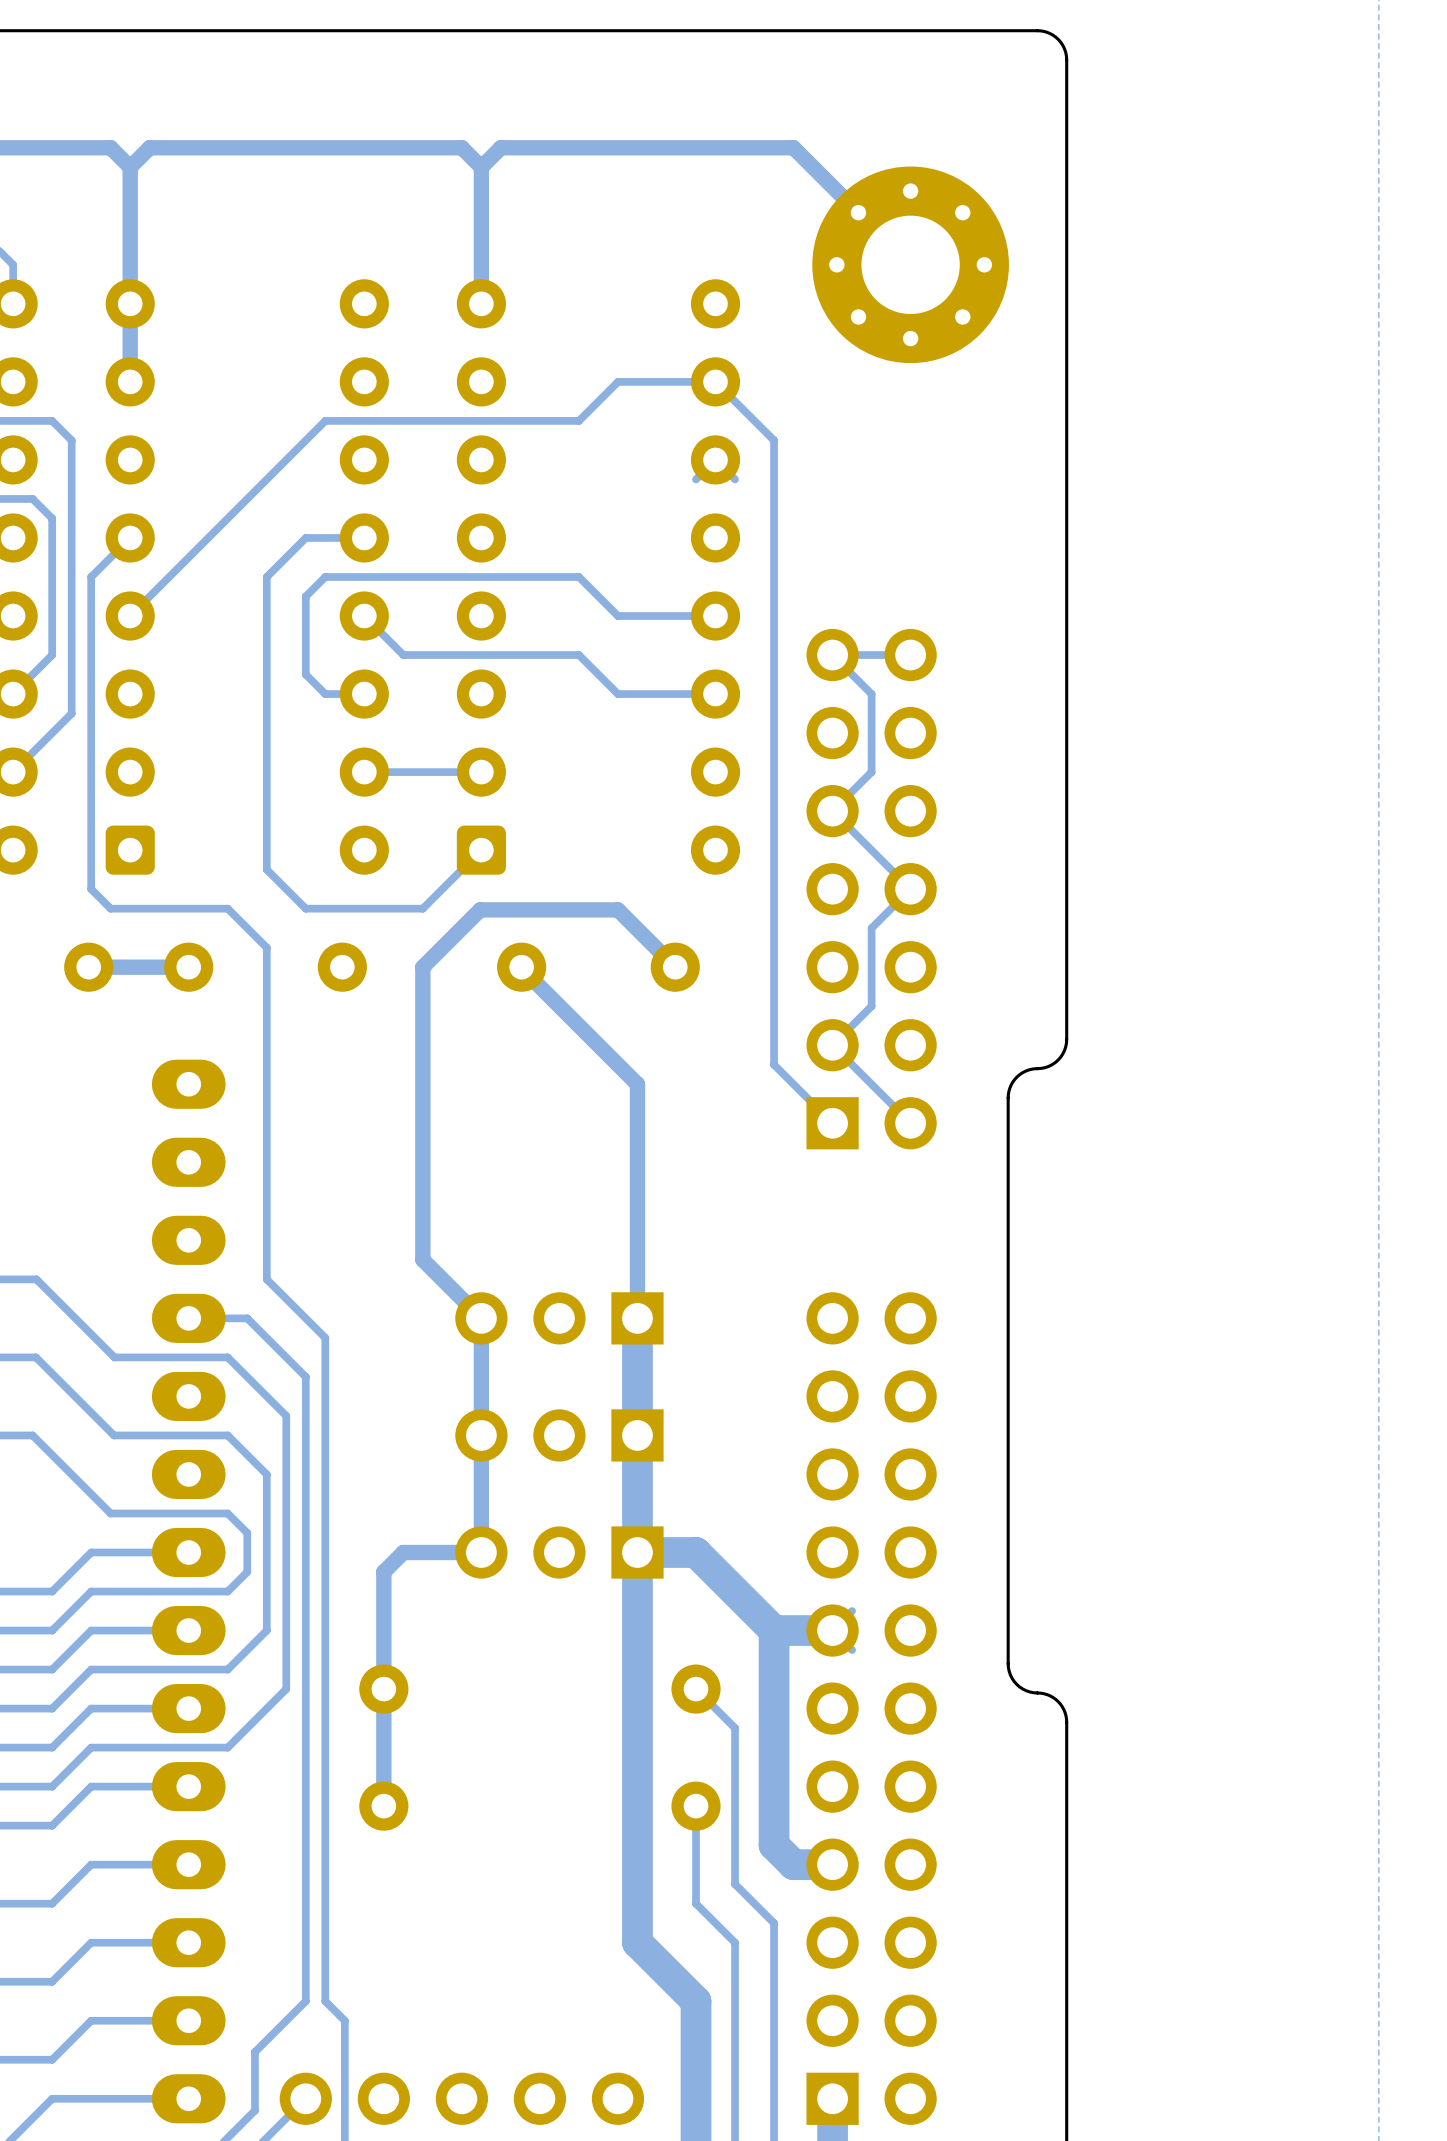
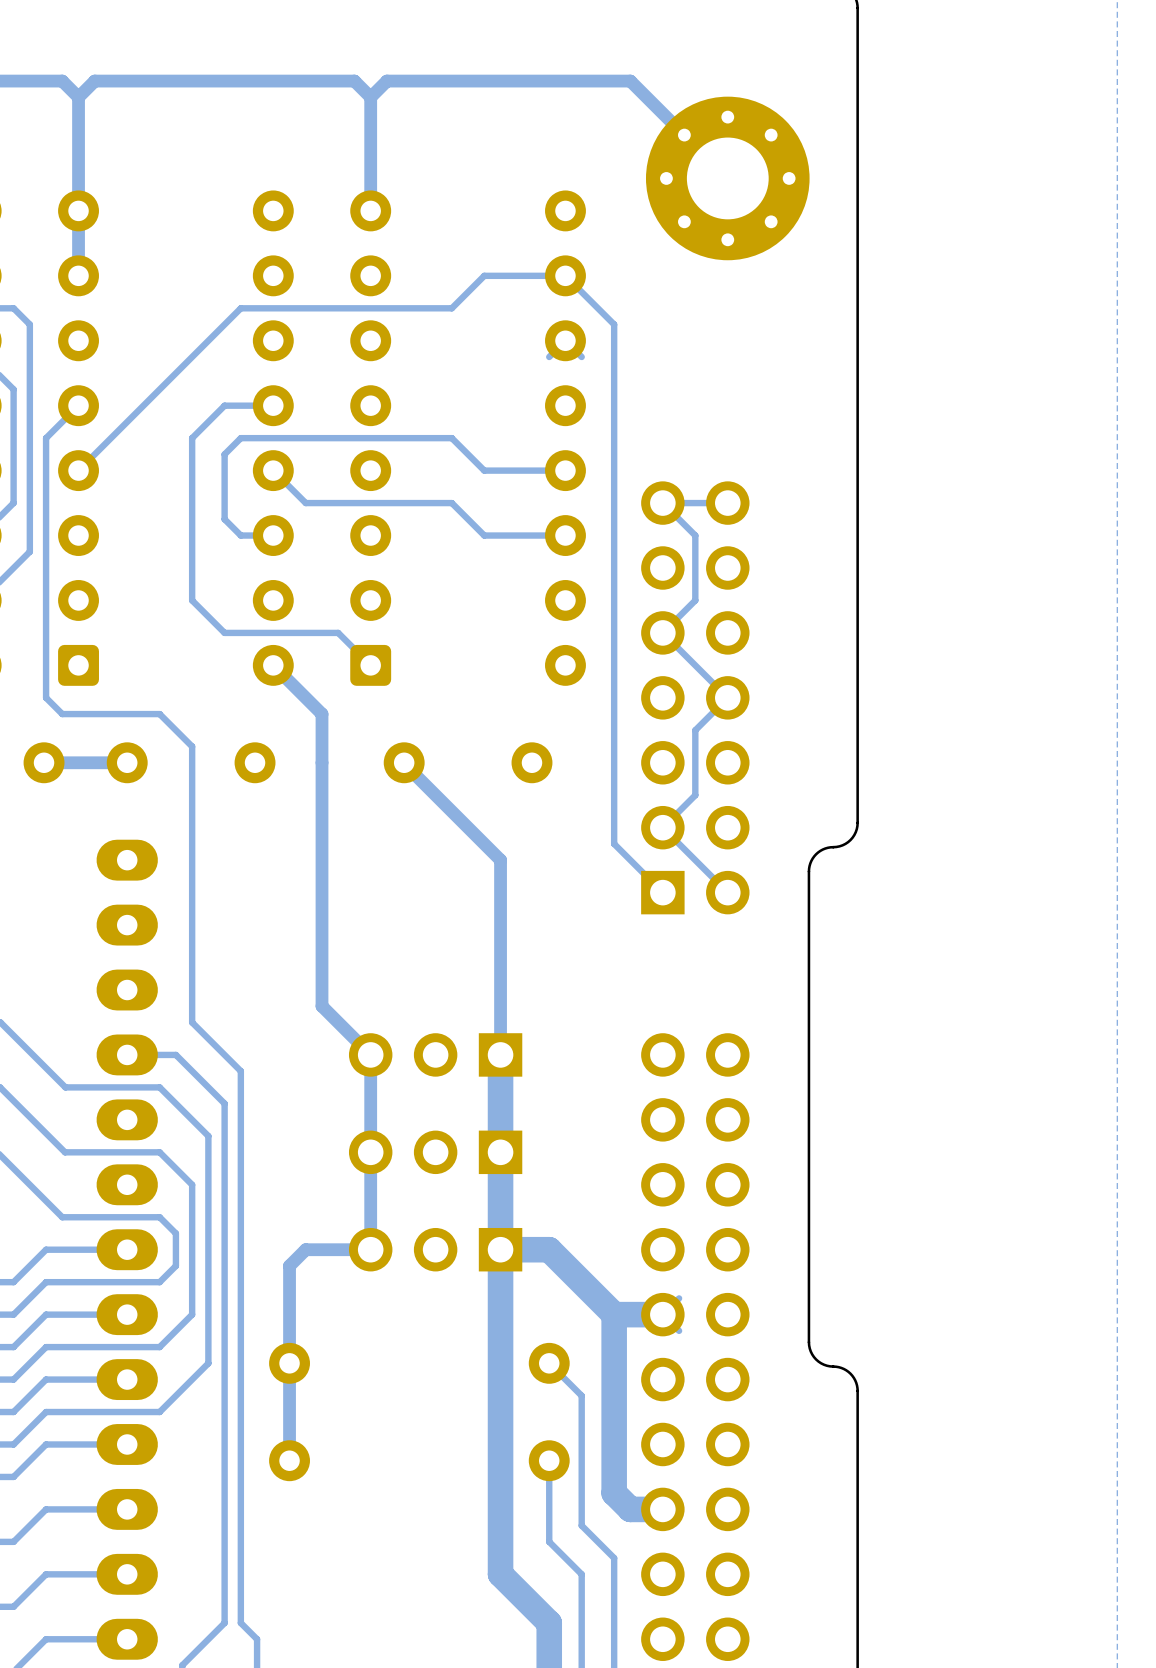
track: (266, 772) (266, 869) (305, 908) (422, 908) (481, 850) -> (192, 600) (224, 632) (338, 632) (370, 665)
track: (481, 772) (364, 772) -> none
track: (675, 967) (617, 909) (480, 909) (422, 967) -> (273, 665) (322, 714) (322, 762)

